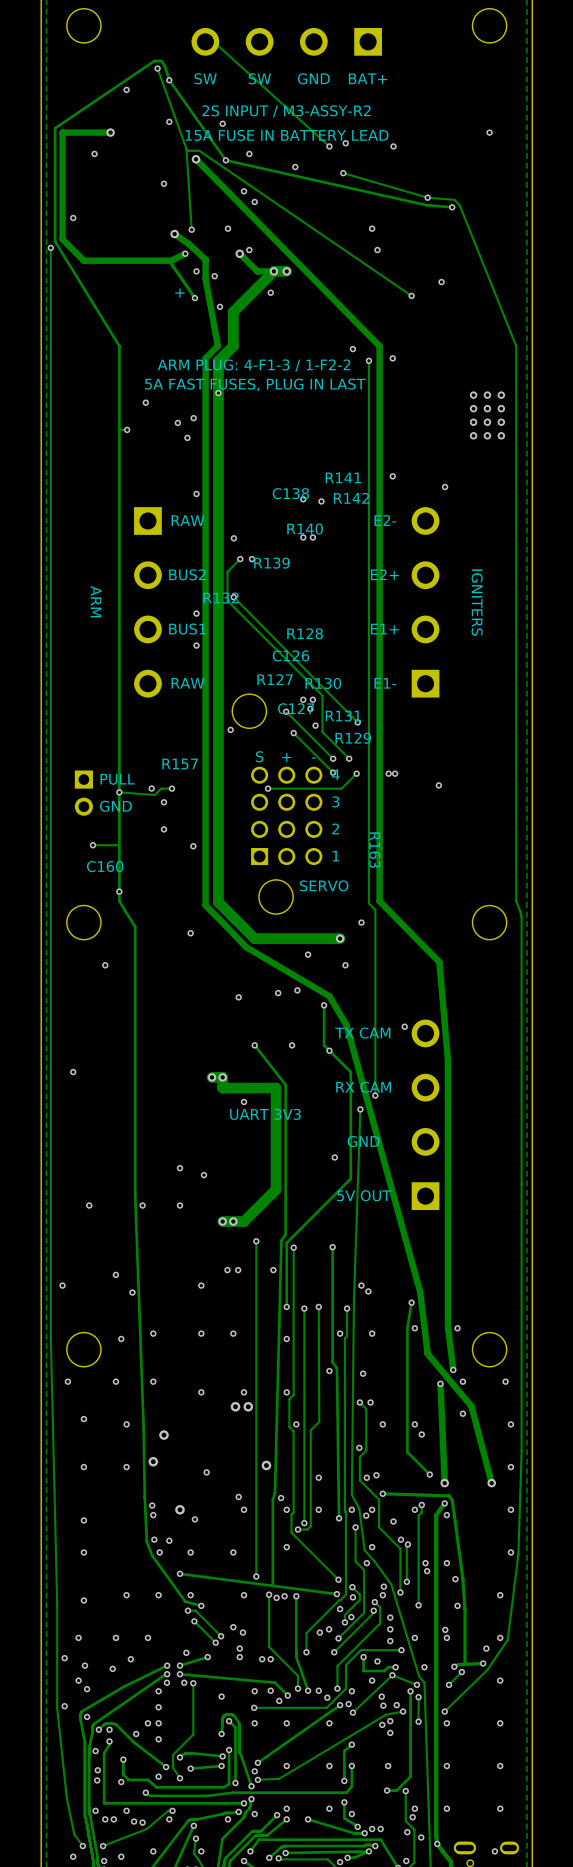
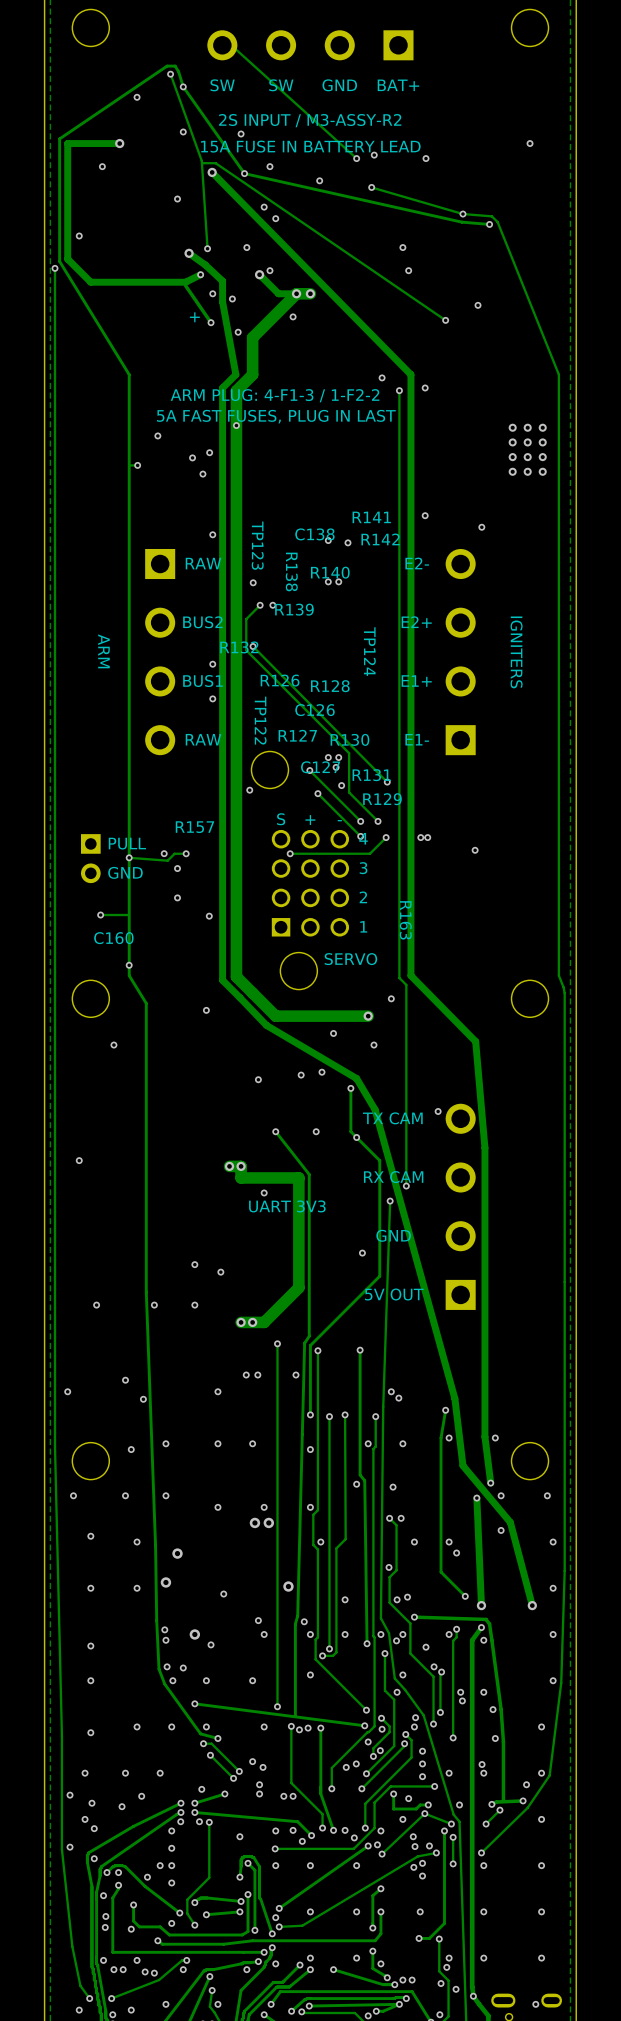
TP123: none -> (257, 545)
R138: none -> (291, 571)
TP124: none -> (369, 651)
R126: none -> (280, 680)
TP122: none -> (260, 720)

